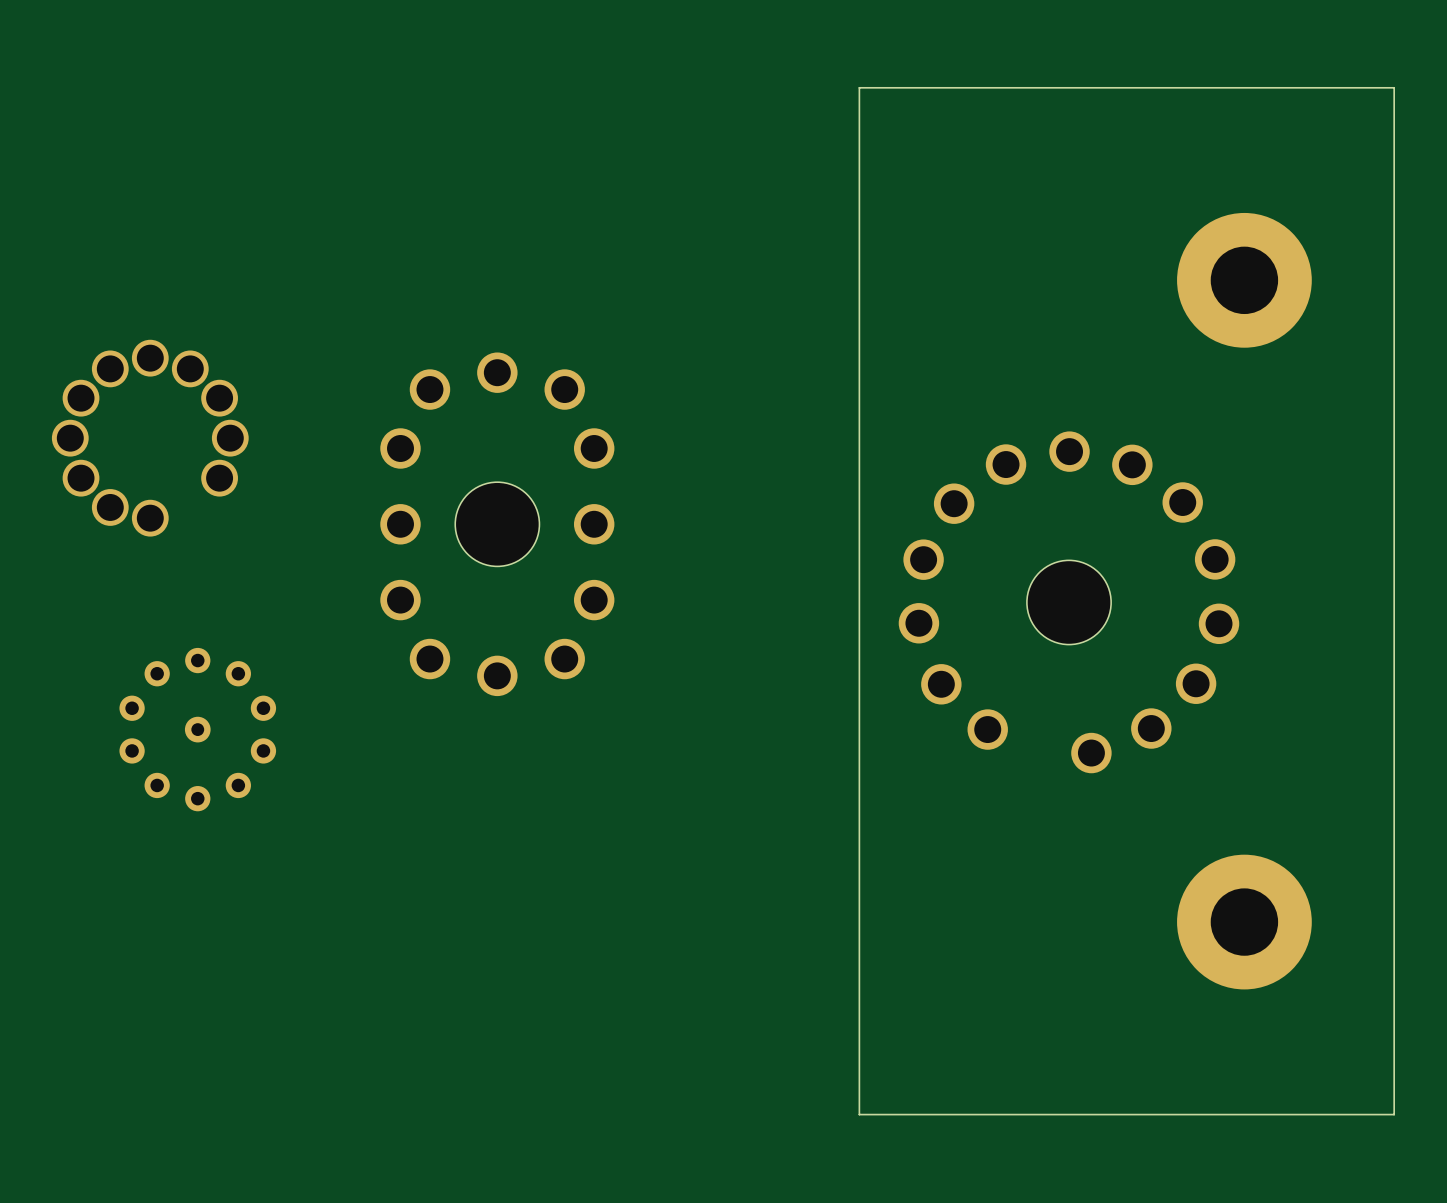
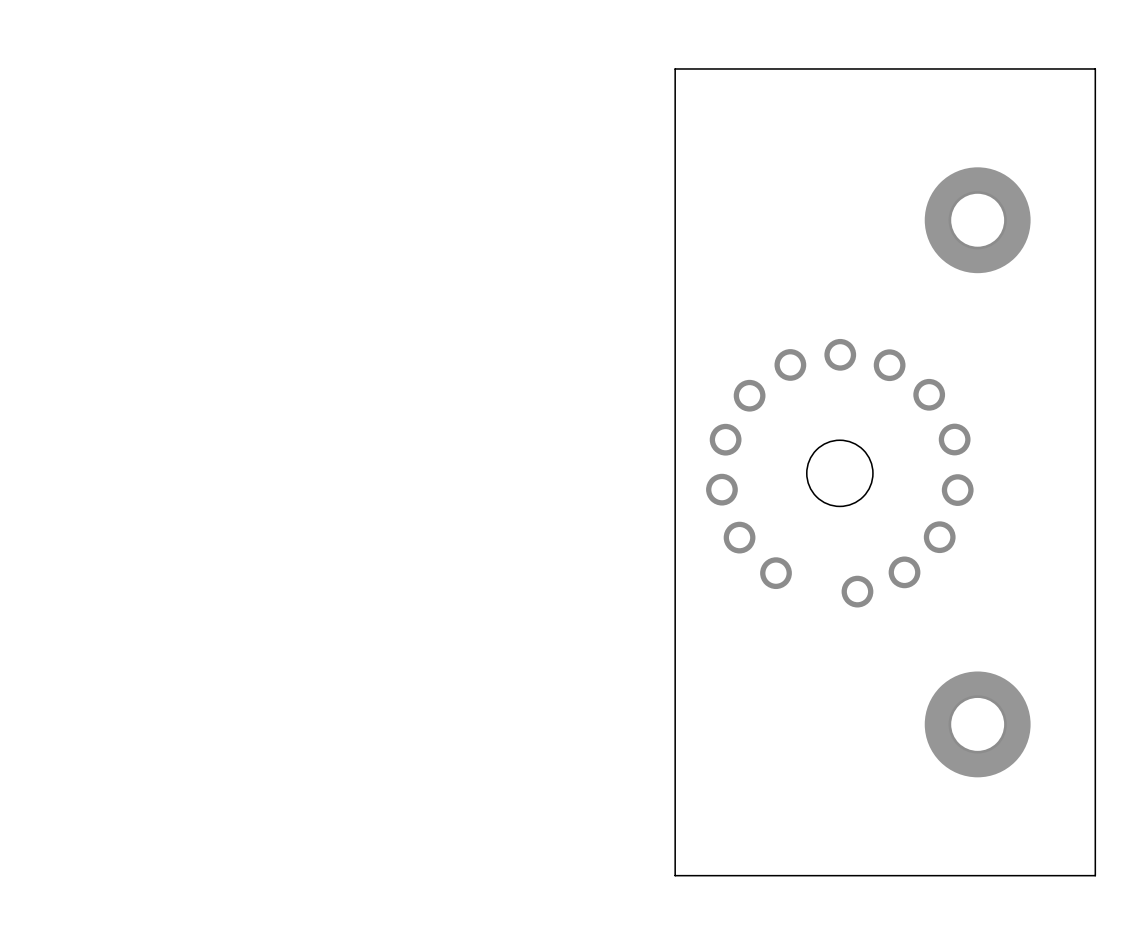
part: (150, 438) -> none
part: (497, 524) -> none
part: (197, 729) -> none

